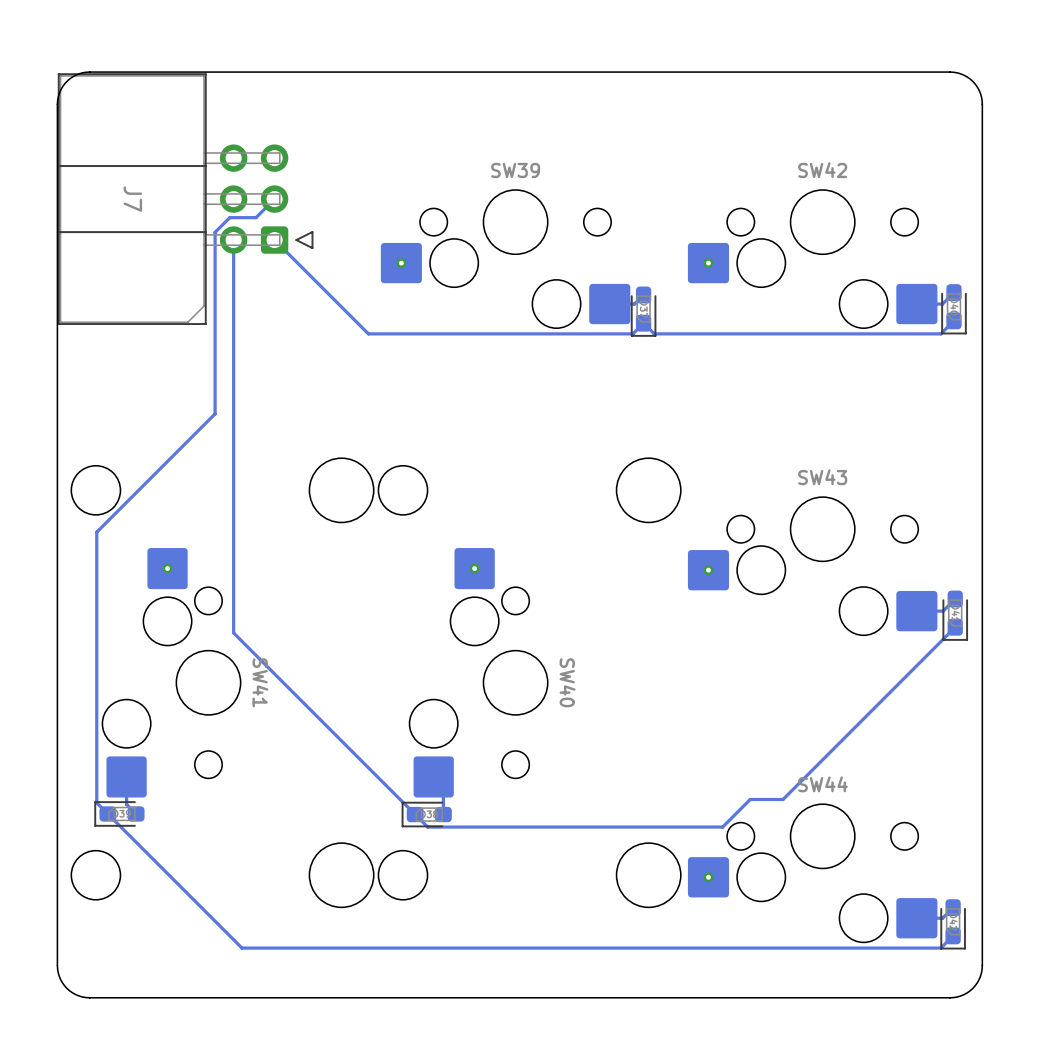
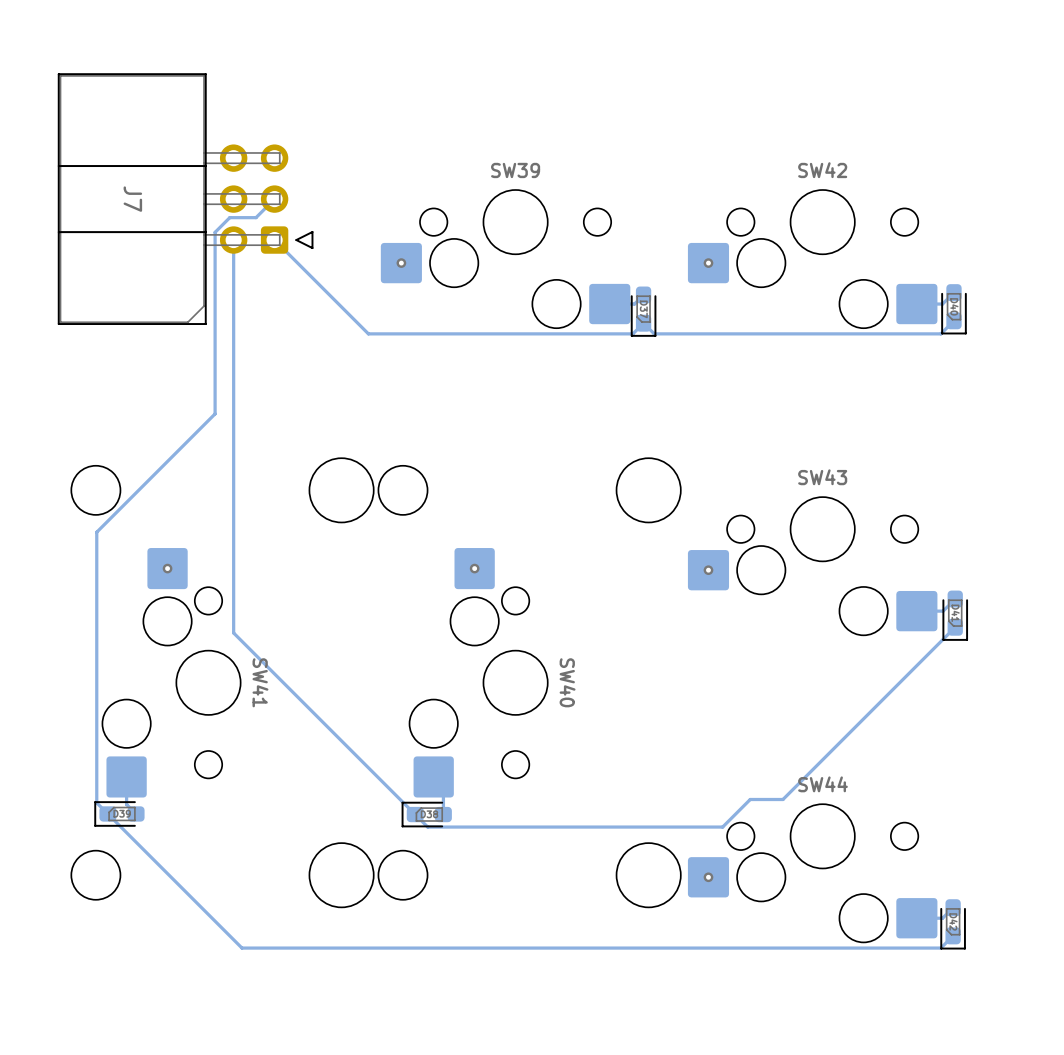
board edge: (950, 72) (89, 72) (79, 73) (66, 81) (60, 90) (57, 104) (57, 965) (59, 976) (66, 988) (75, 994) (89, 997) (950, 997) (964, 994) (972, 988) (979, 979) (982, 965) (982, 104) (980, 93) (972, 81) (960, 73) (950, 72) -> none

